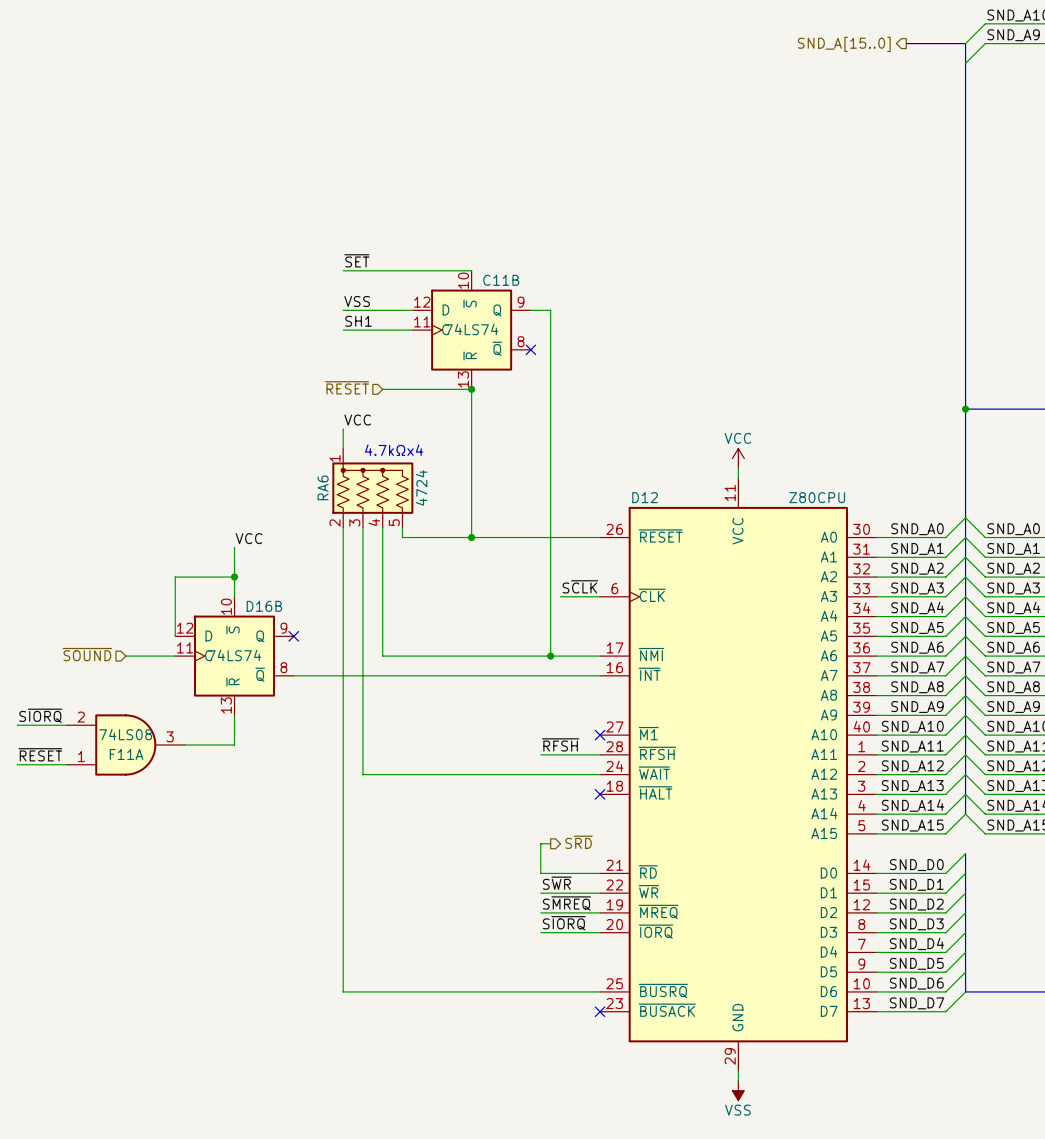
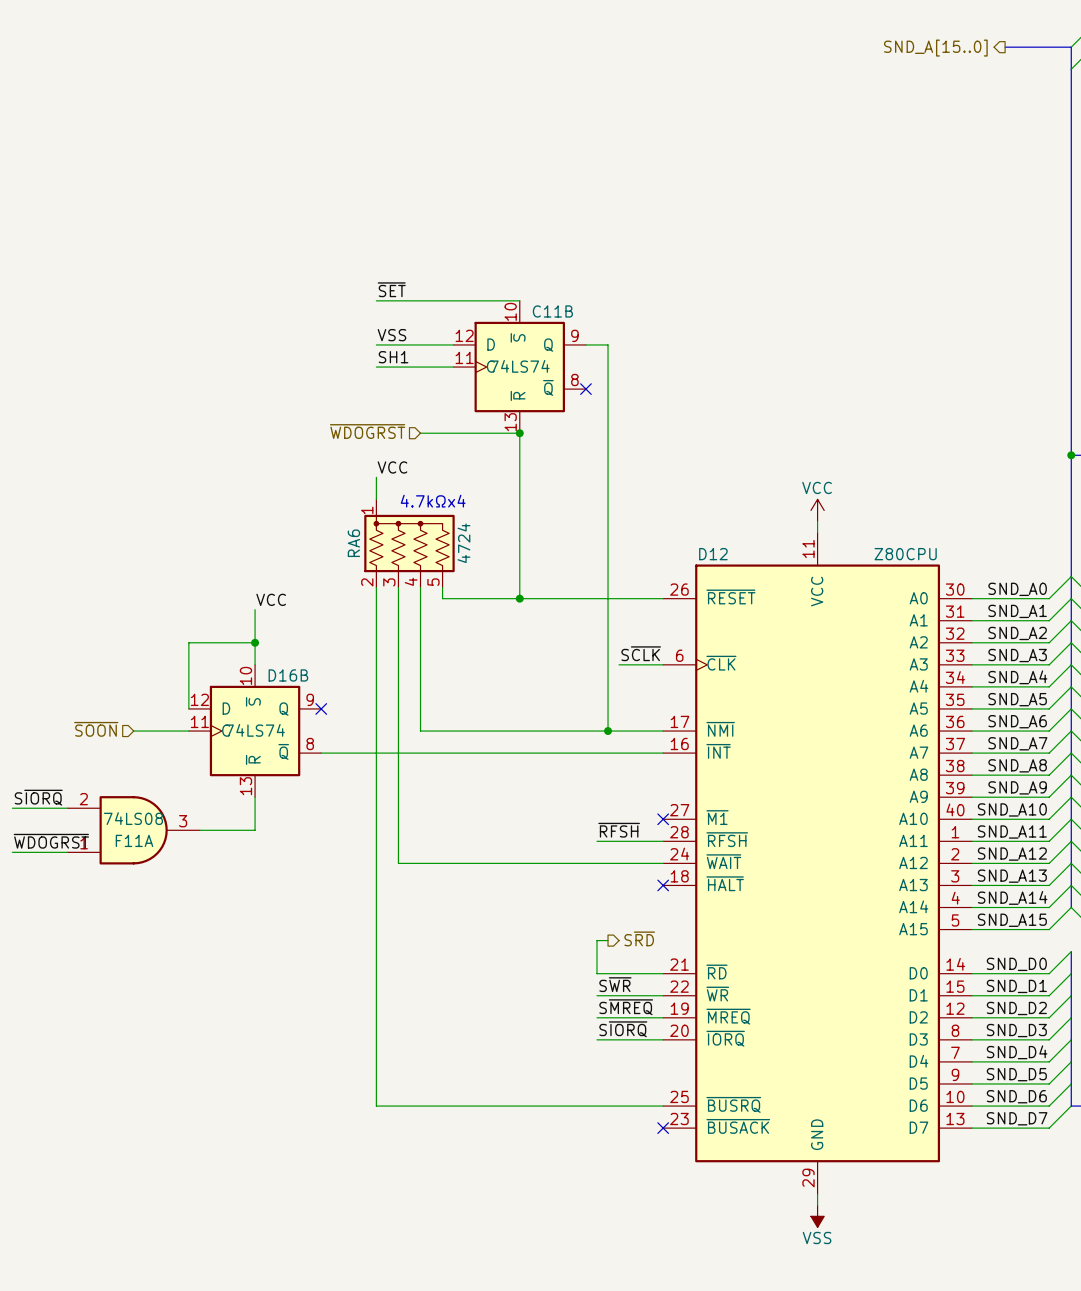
hierarchical label: ~{RESET} (347, 387) -> ~{WDOGRST} (367, 431)
hierarchical label: ~{SOUND} (87, 654) -> ~{SOON} (96, 729)
label: ~{RESET} (40, 754) -> ~{WDOGRST} (51, 841)

